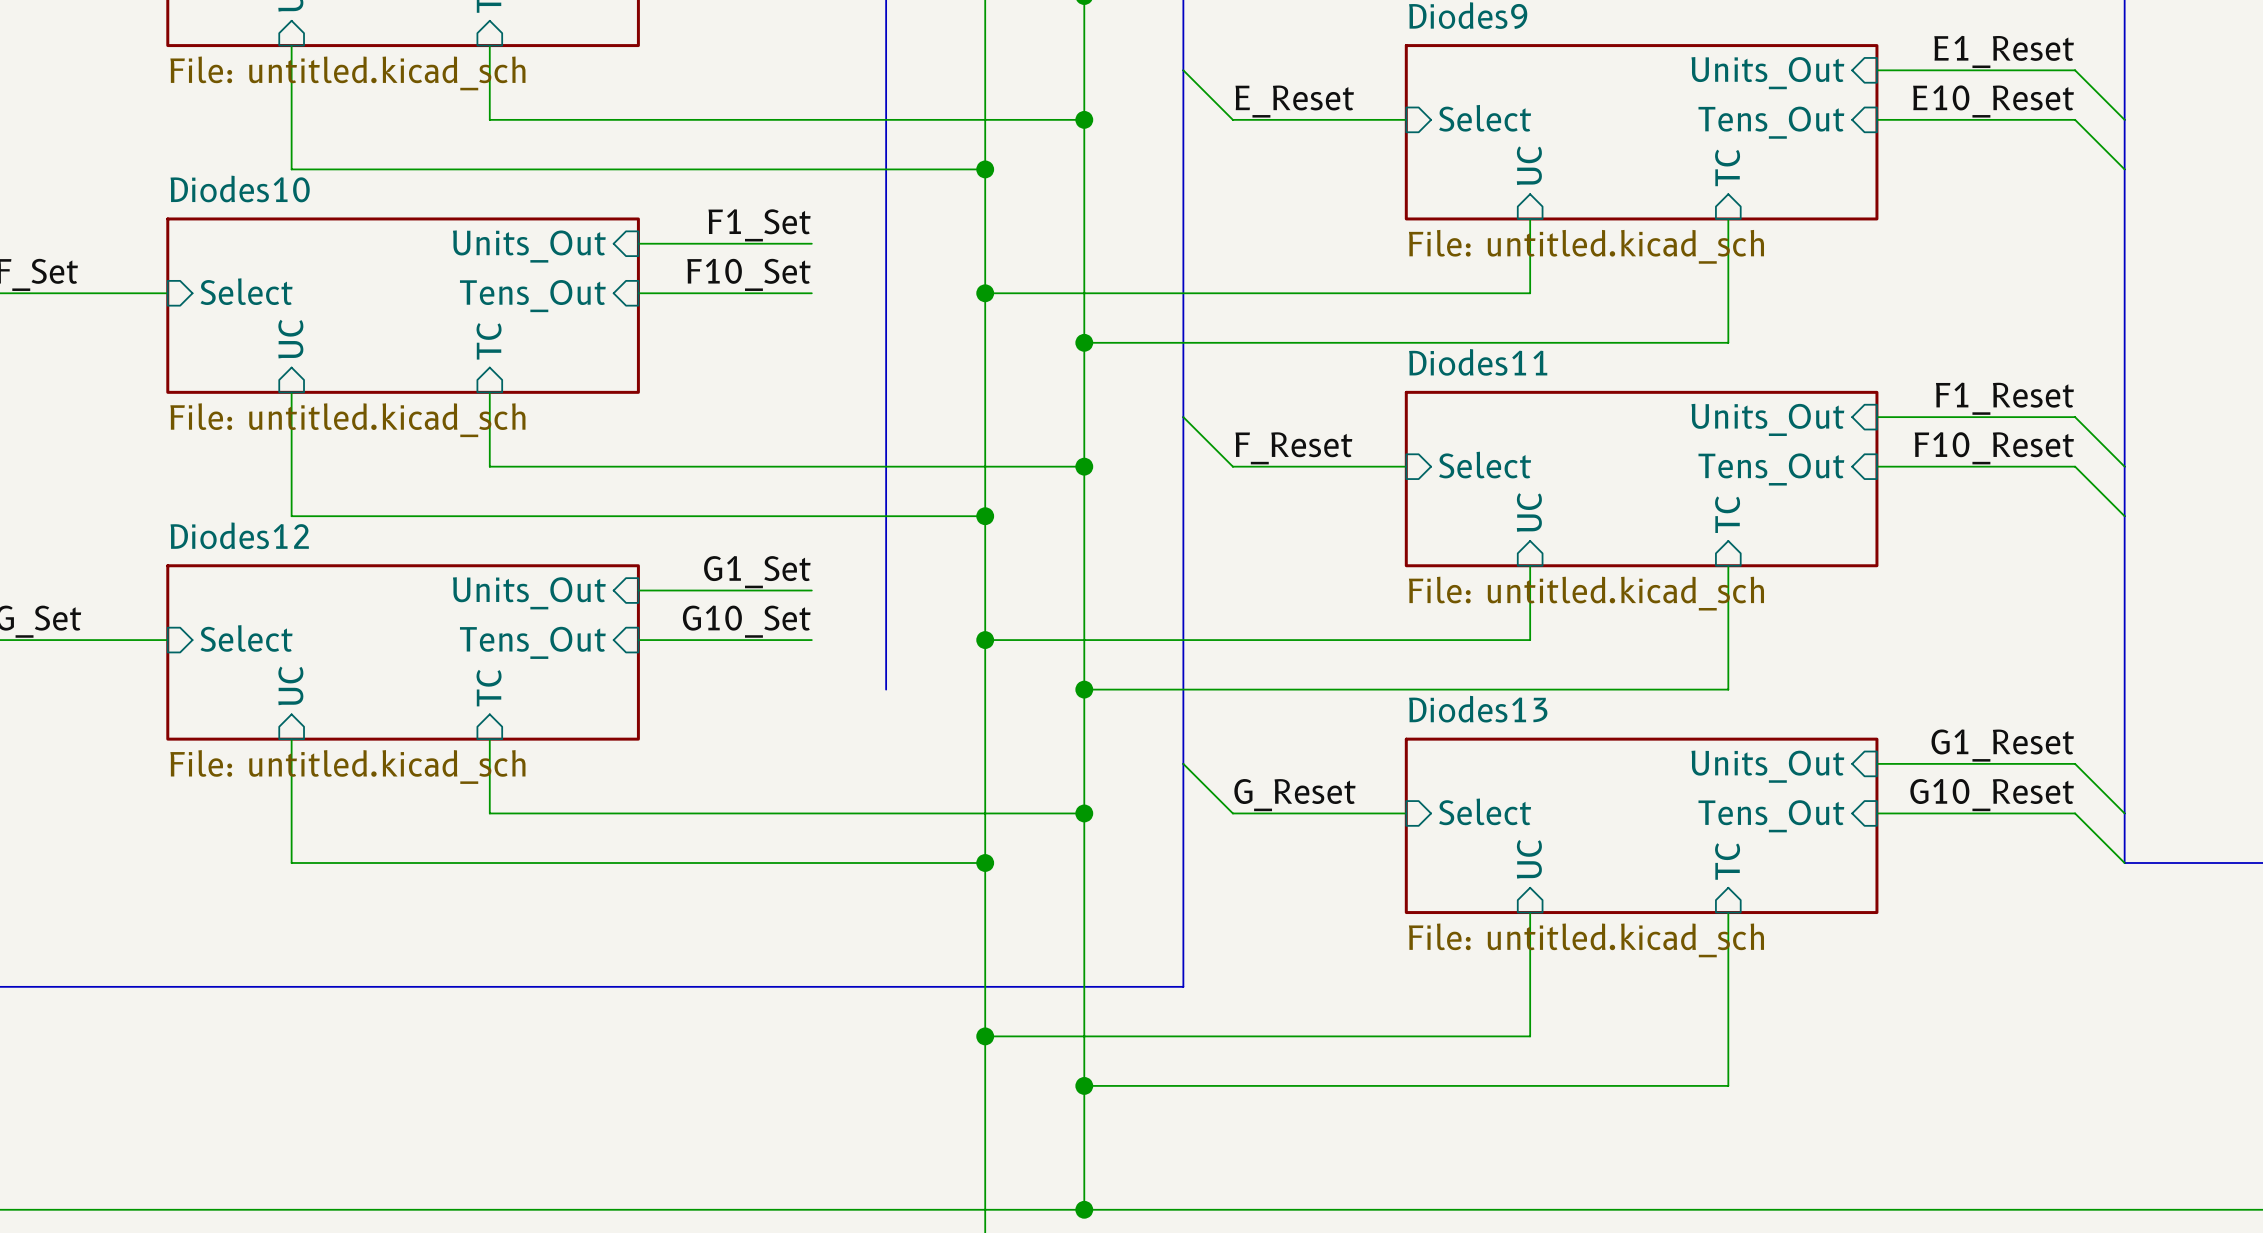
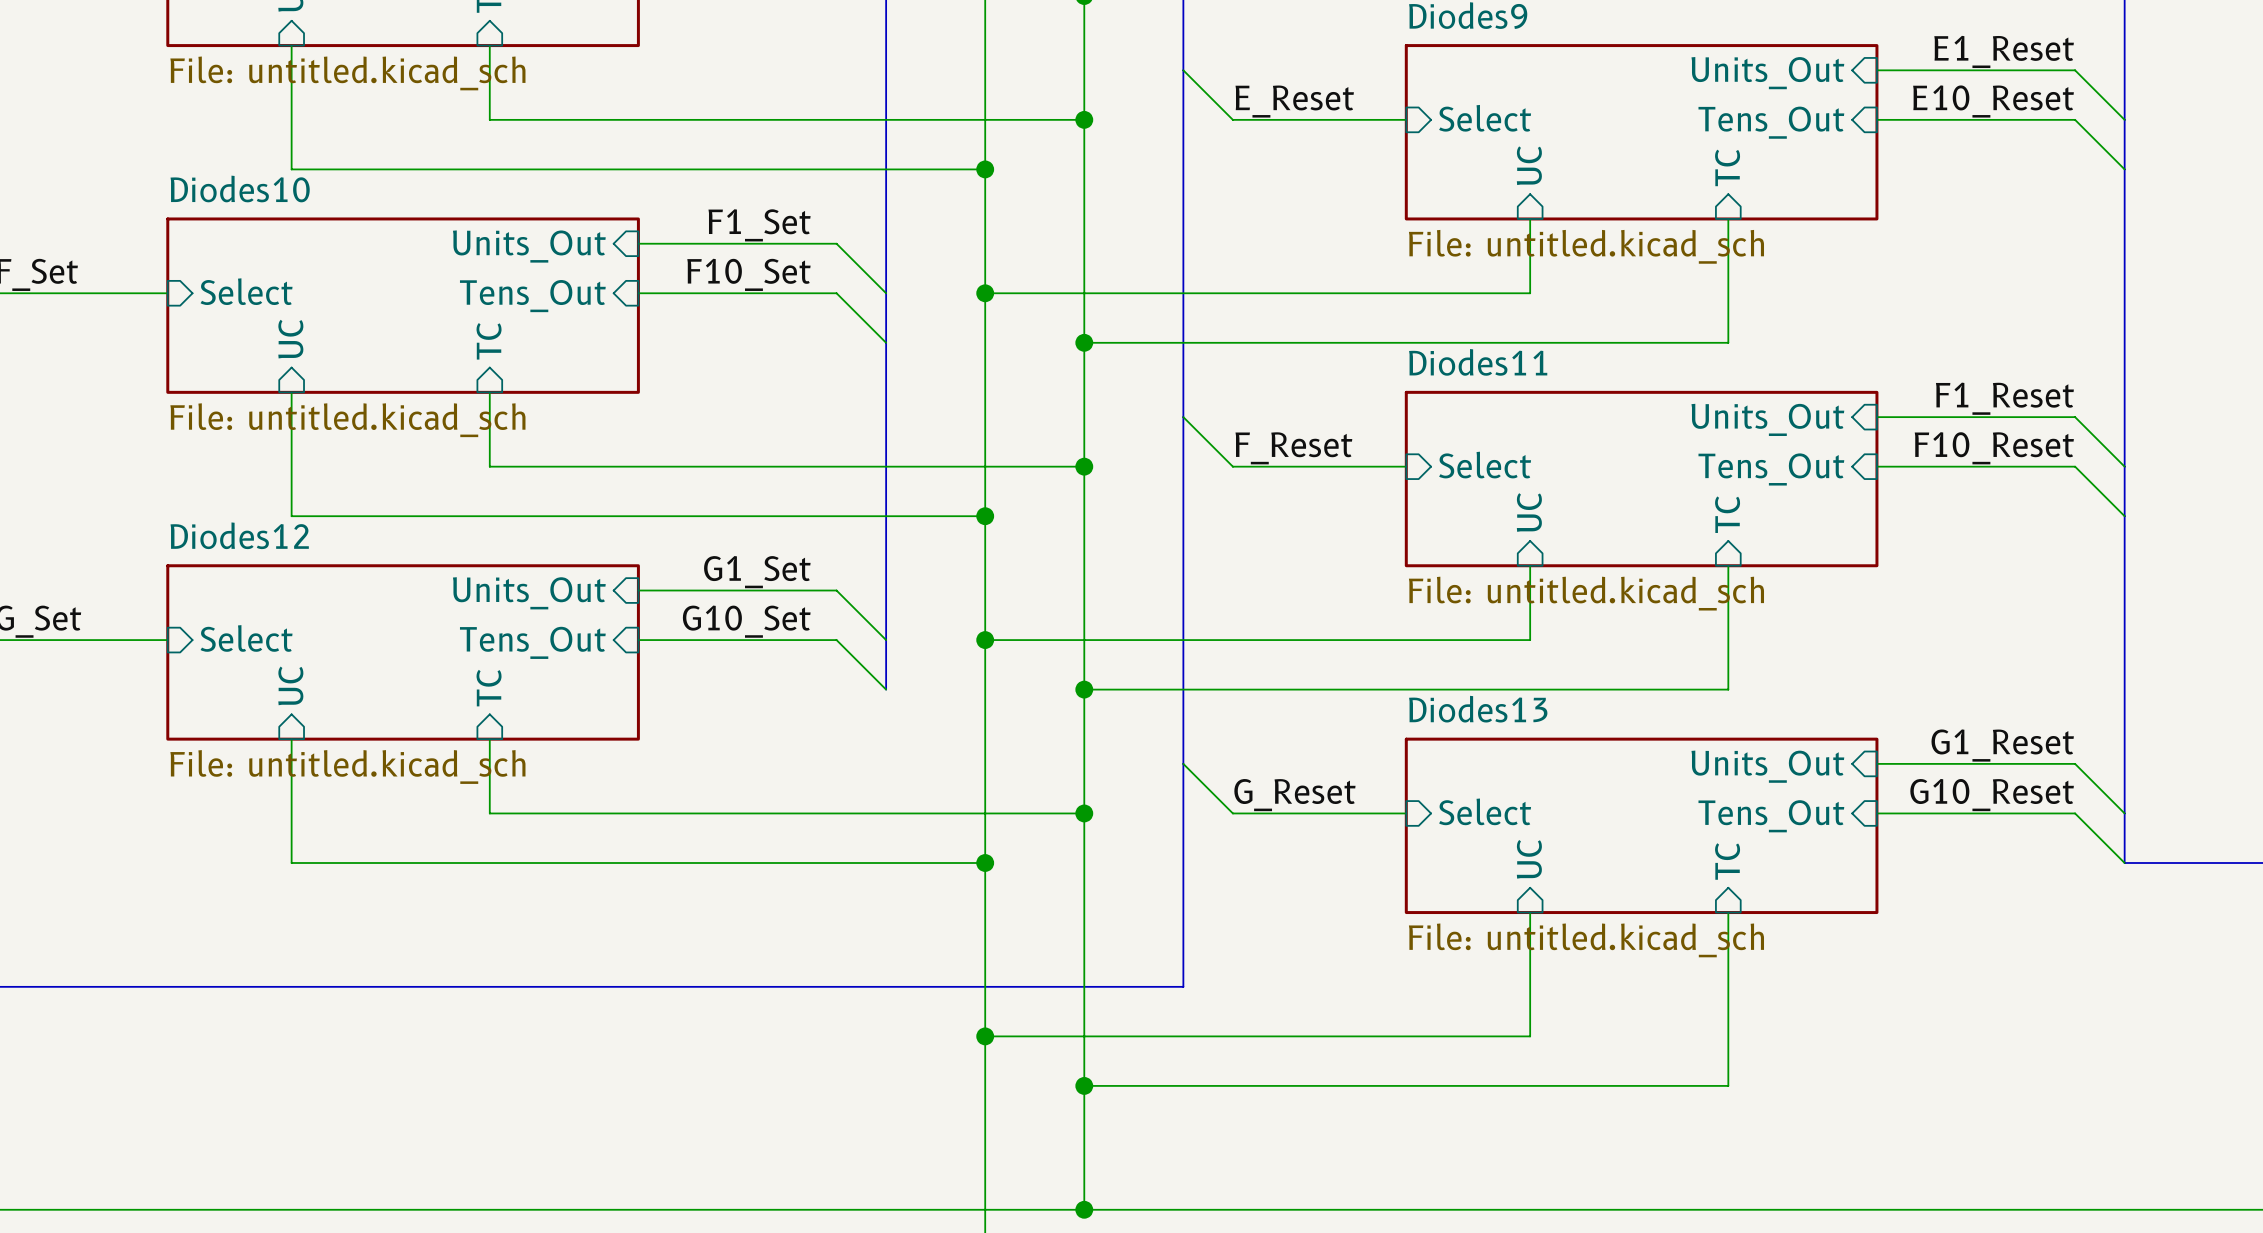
wire: none -> (811, 243) (836, 243) (886, 293)
wire: none -> (811, 293) (836, 293) (886, 342)
wire: none -> (811, 590) (836, 590) (886, 640)
wire: none -> (811, 640) (836, 640) (886, 689)

